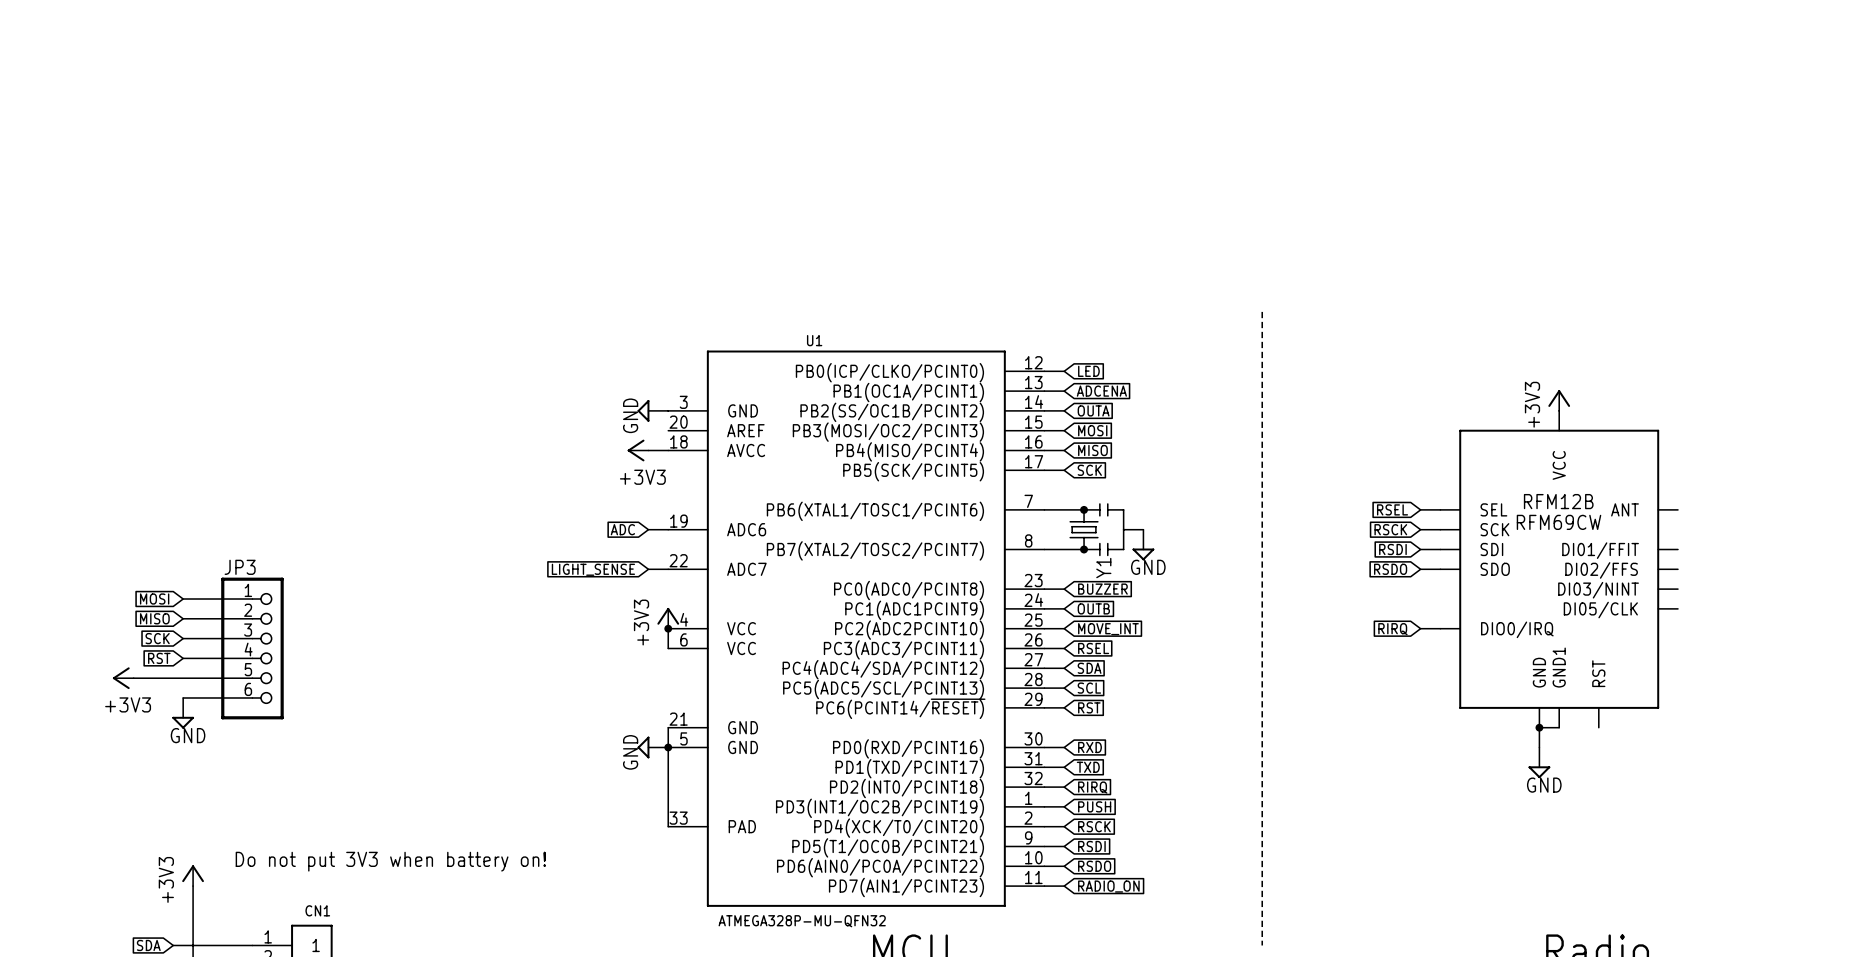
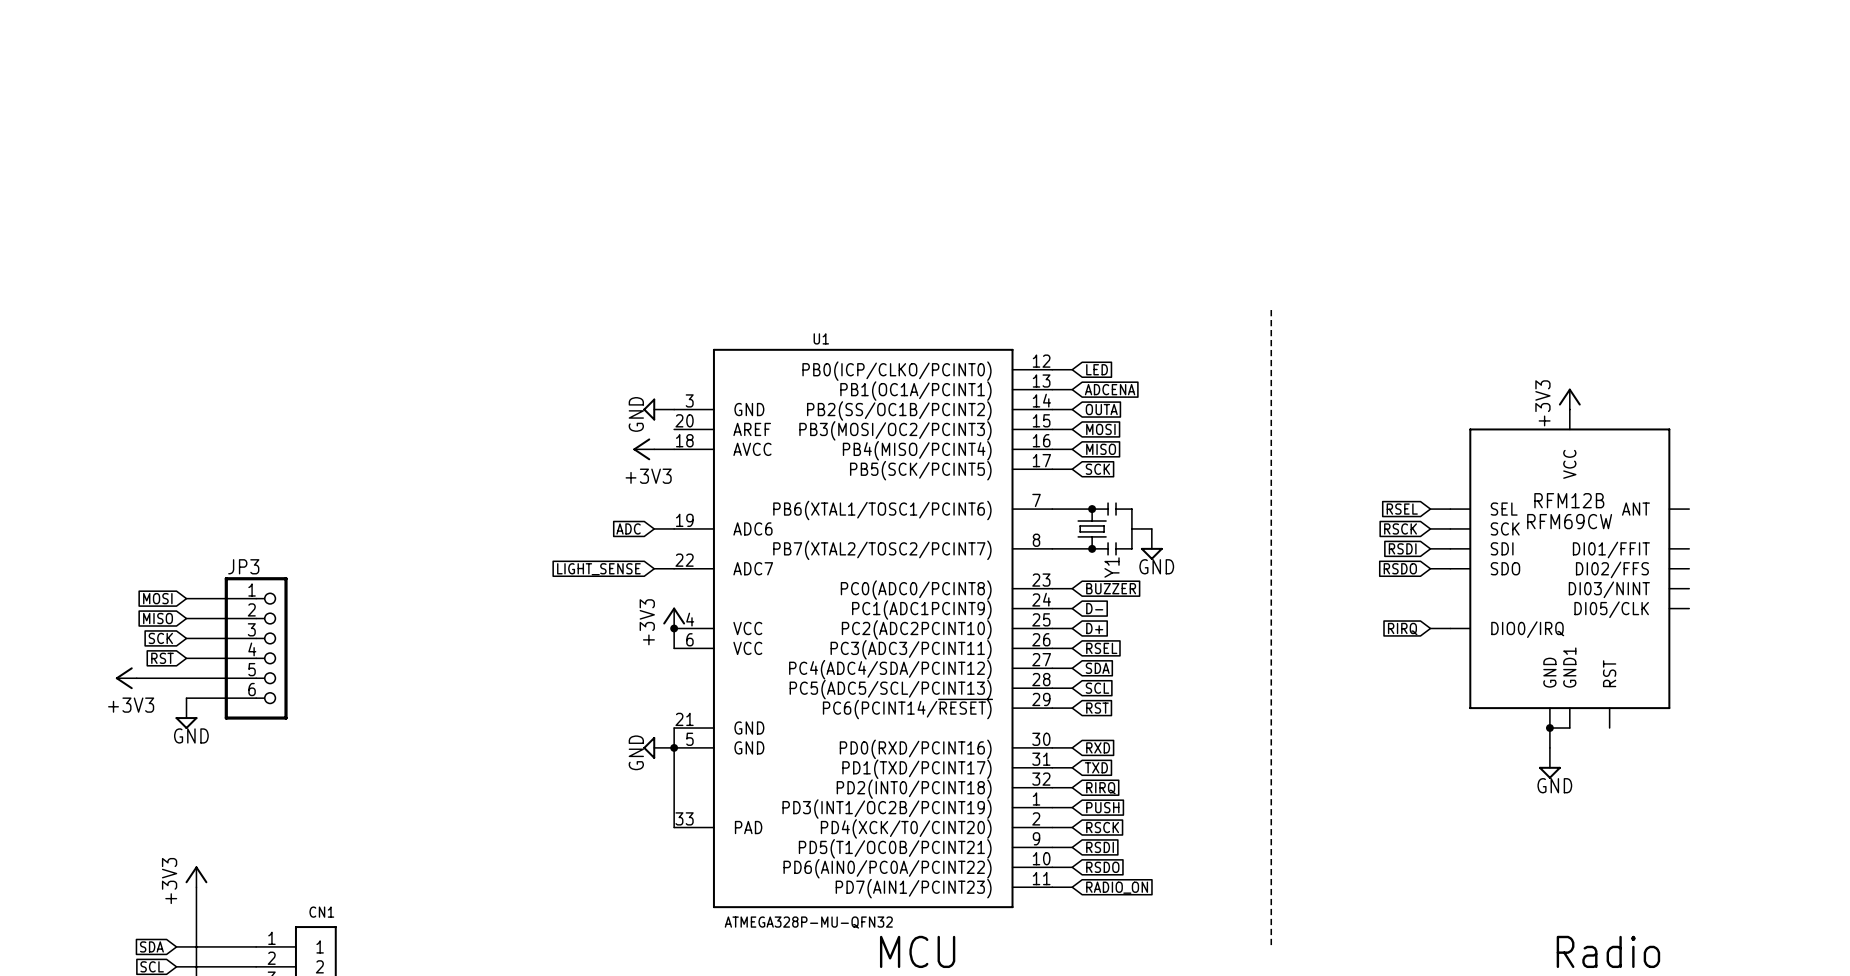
global label: OUTB (1093, 608) -> D- (1094, 608)
global label: MOVE_INT (1108, 629) -> D+ (1094, 628)
text: Do not put 3V3 when battery on! (390, 861) -> none

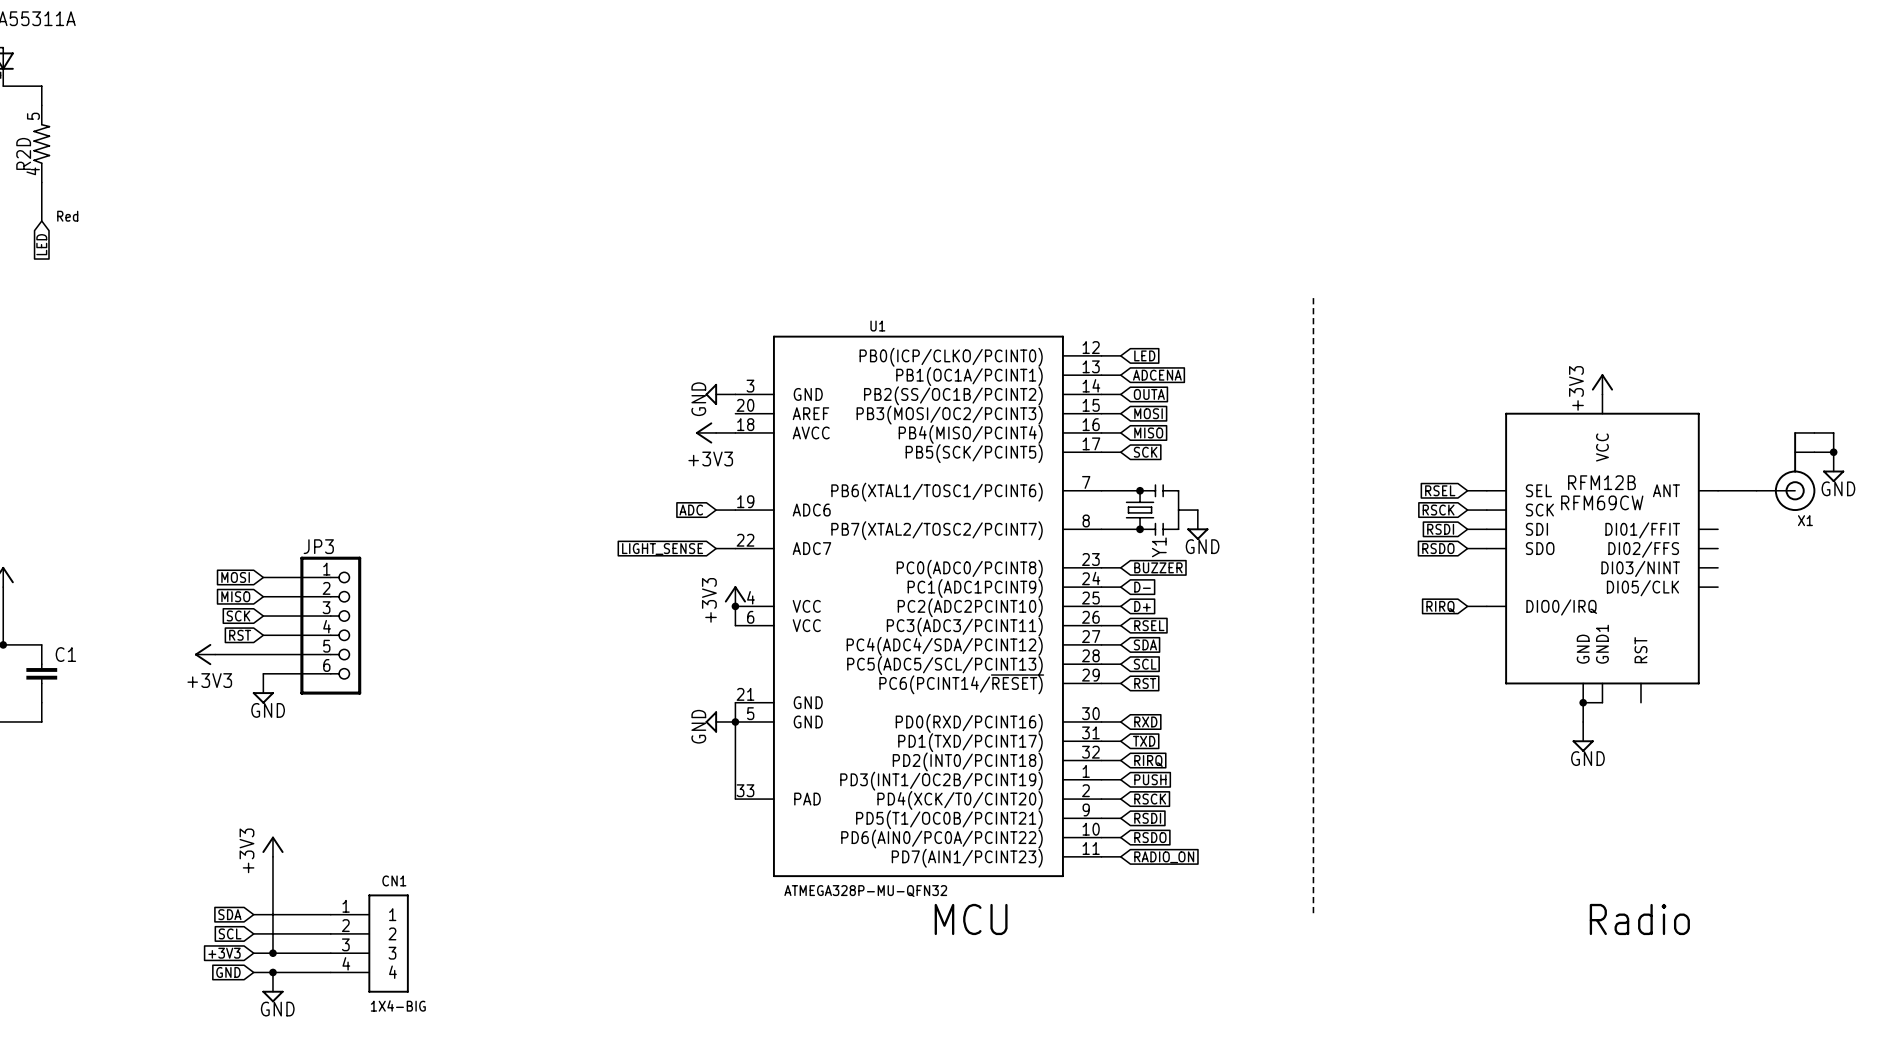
wire: none -> (1814, 432) (1833, 432) (1833, 452) (1814, 452)
junction: none -> (1833, 452)
power symbol: none -> GND (1833, 467)
X1: none -> (1785, 471)
wire: none -> (1718, 490) (1756, 490)

